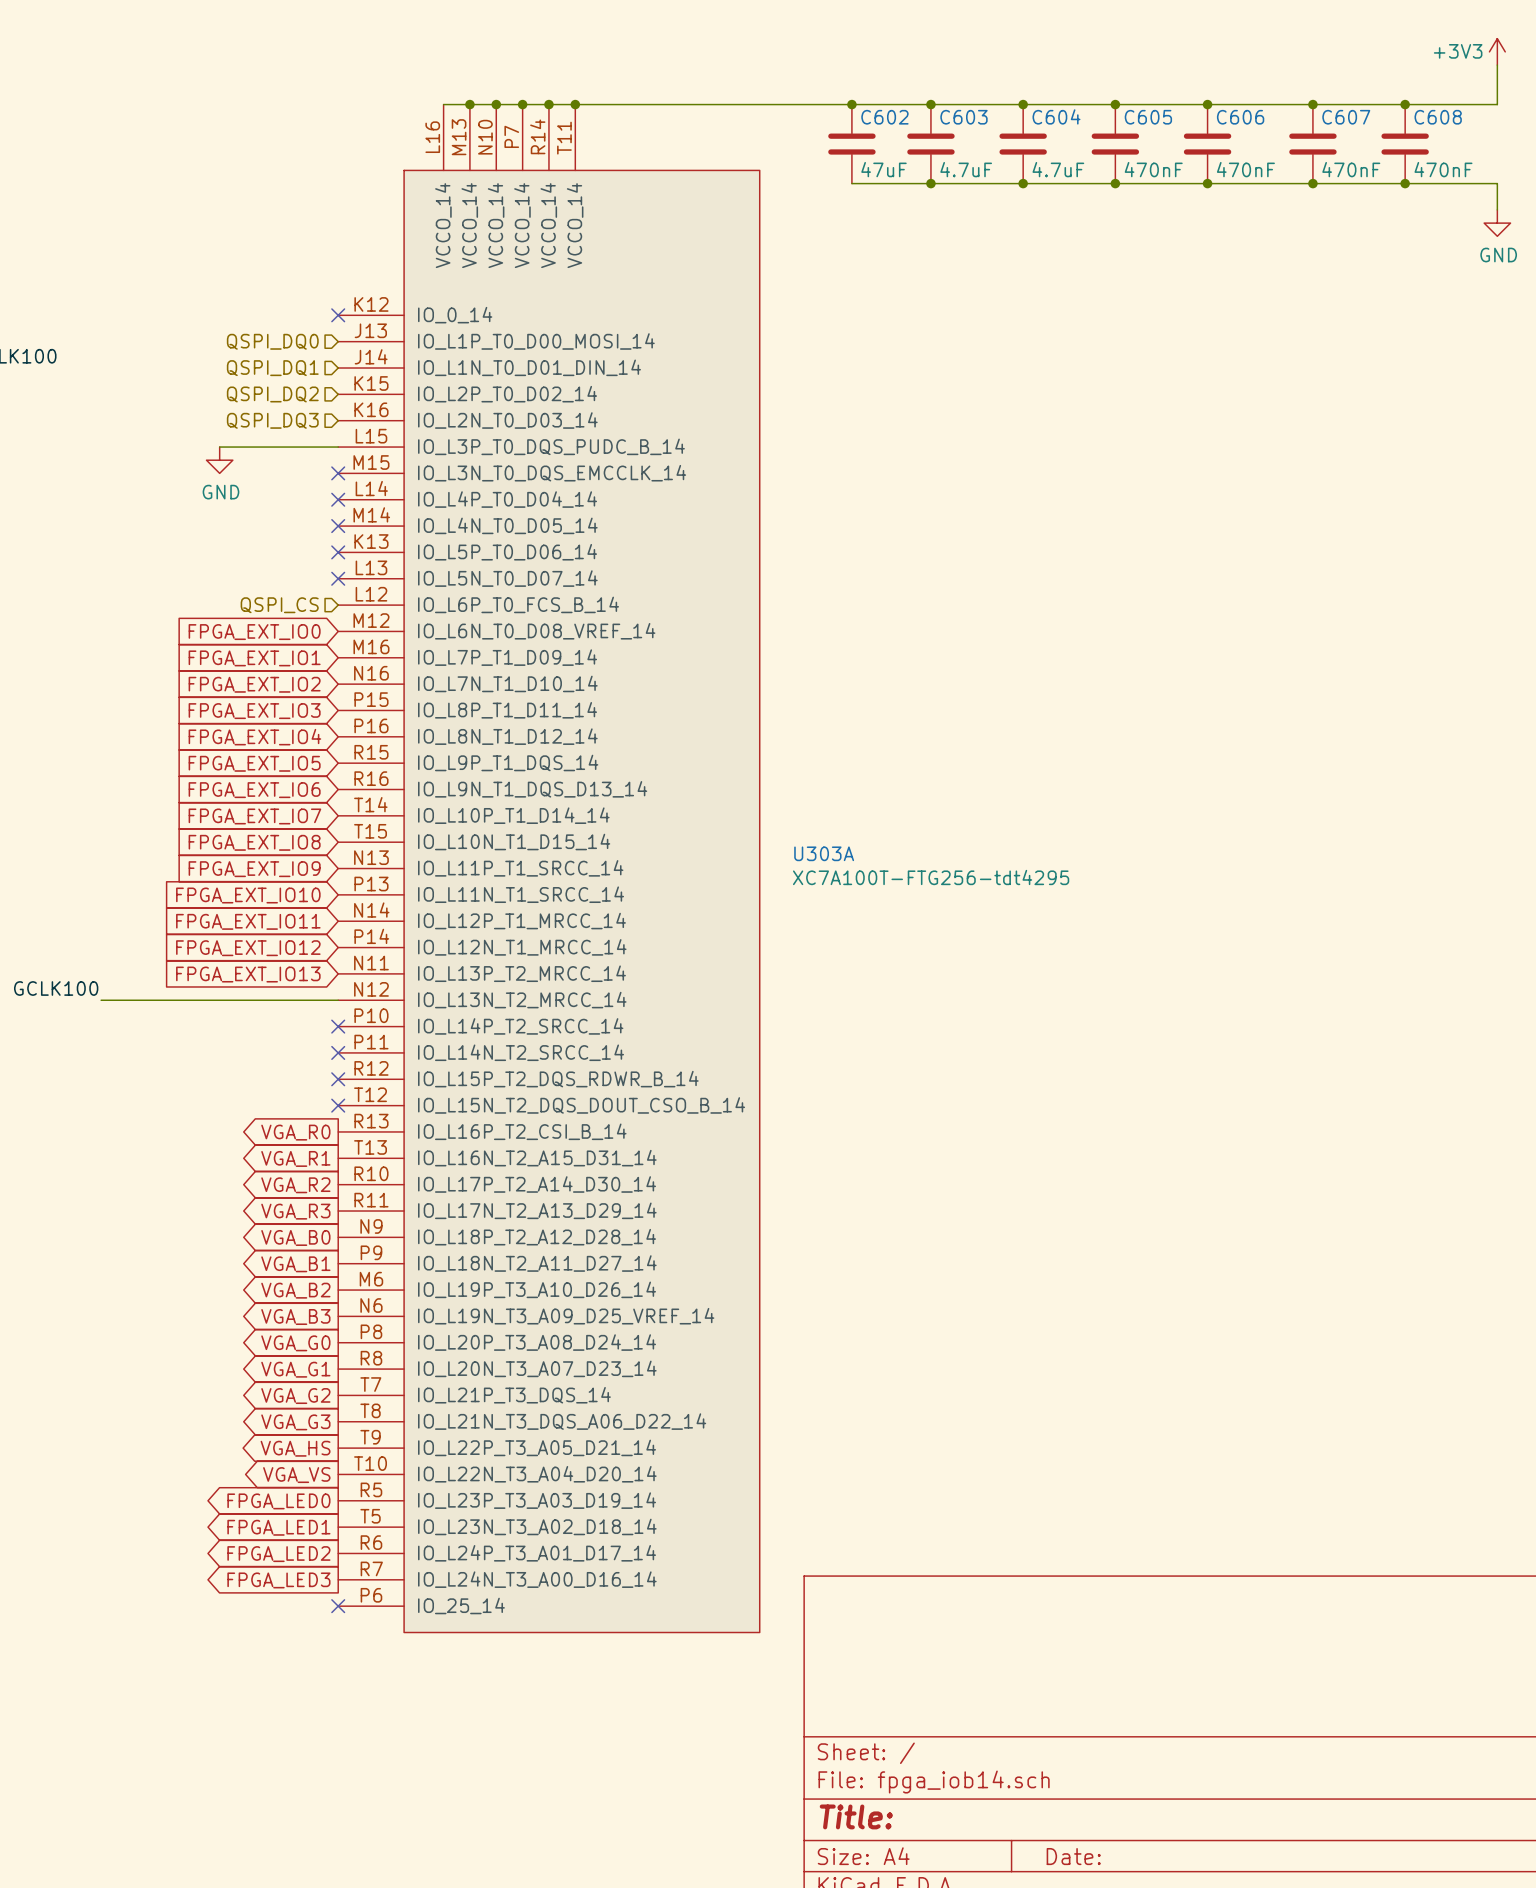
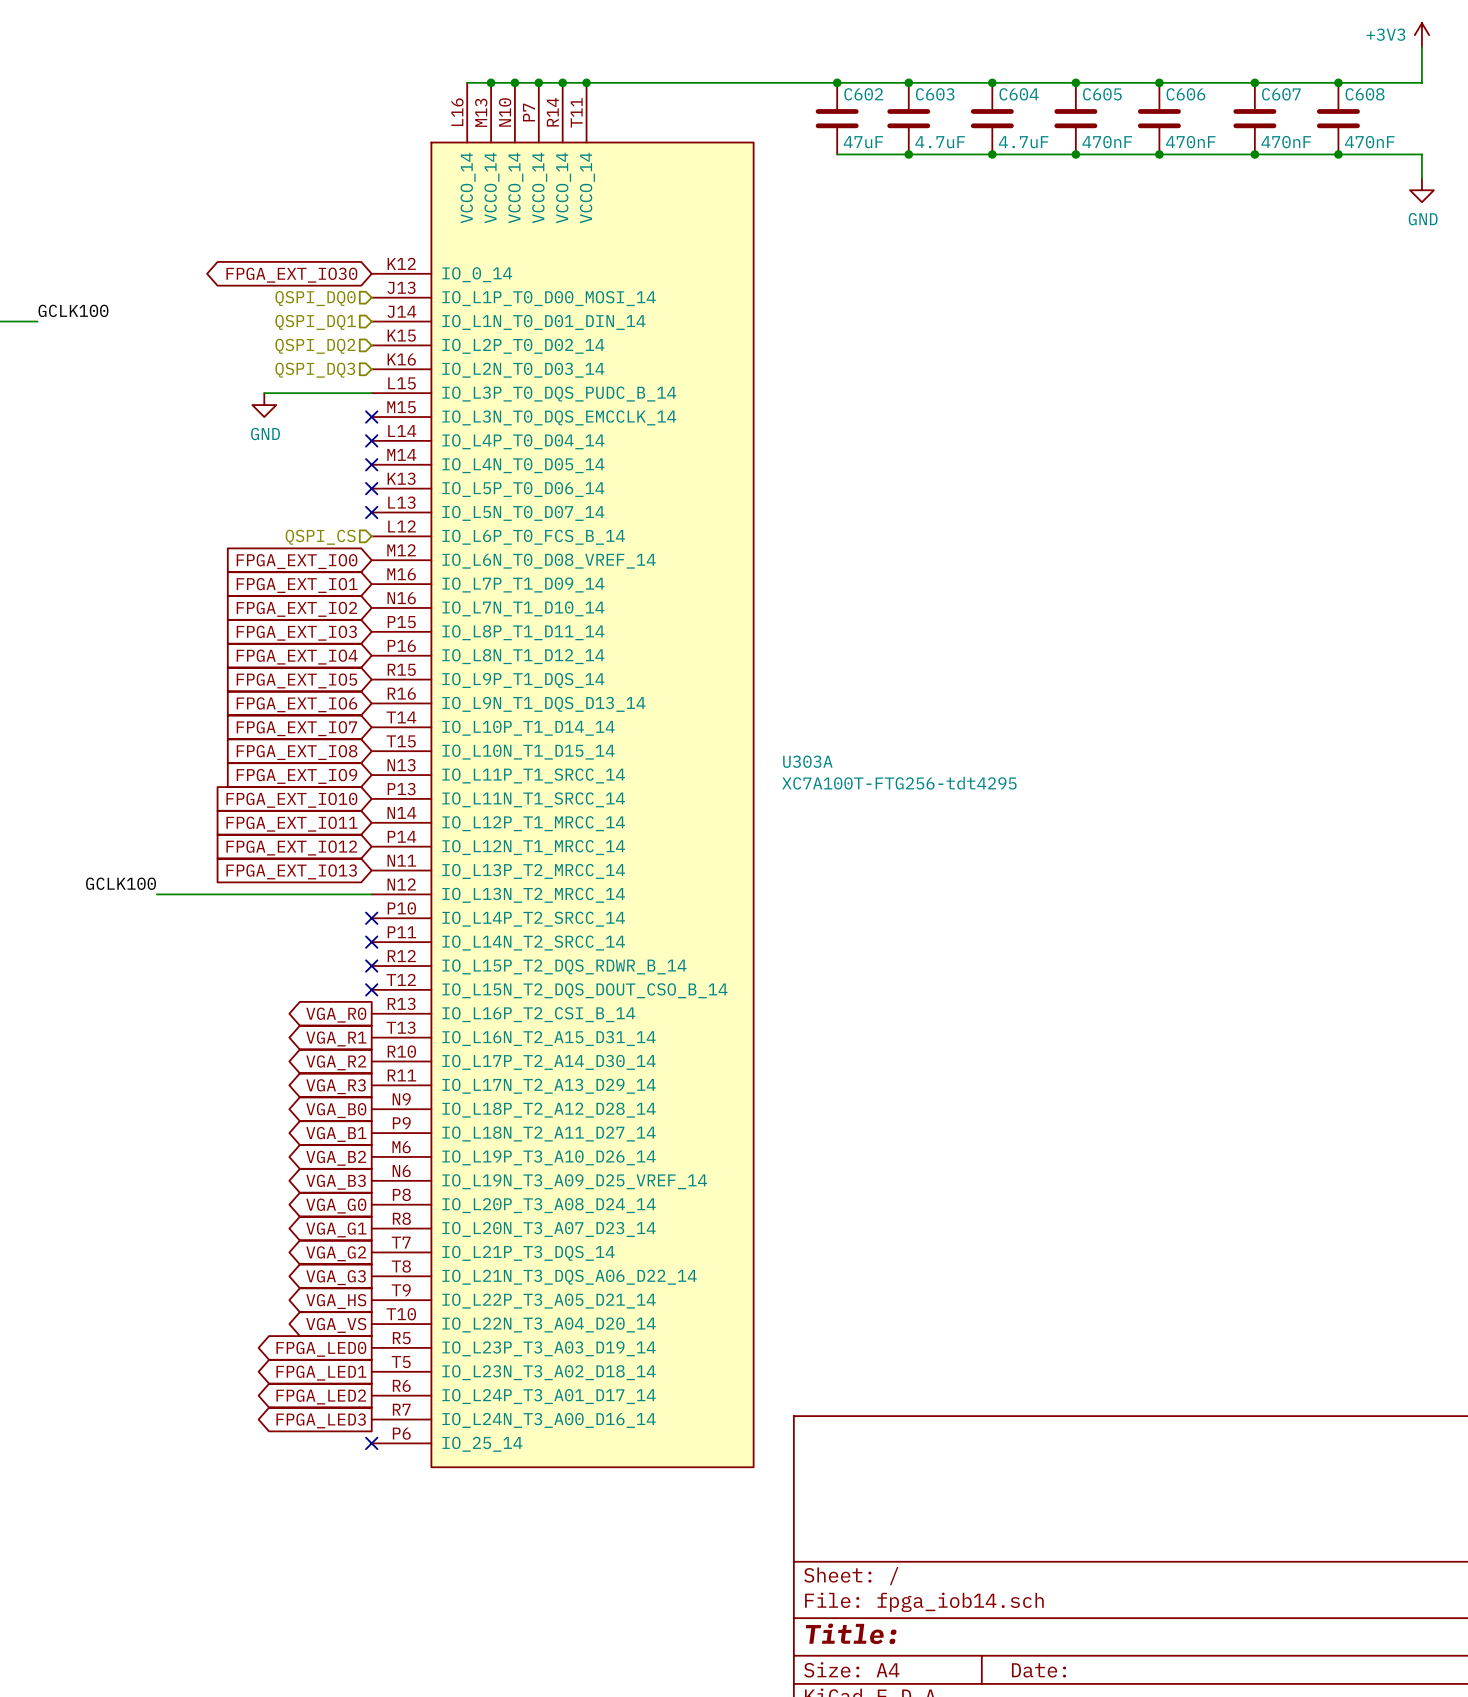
global label: none -> FPGA_EXT_IO30 (291, 275)
no-connect mark: (338, 315) -> none

